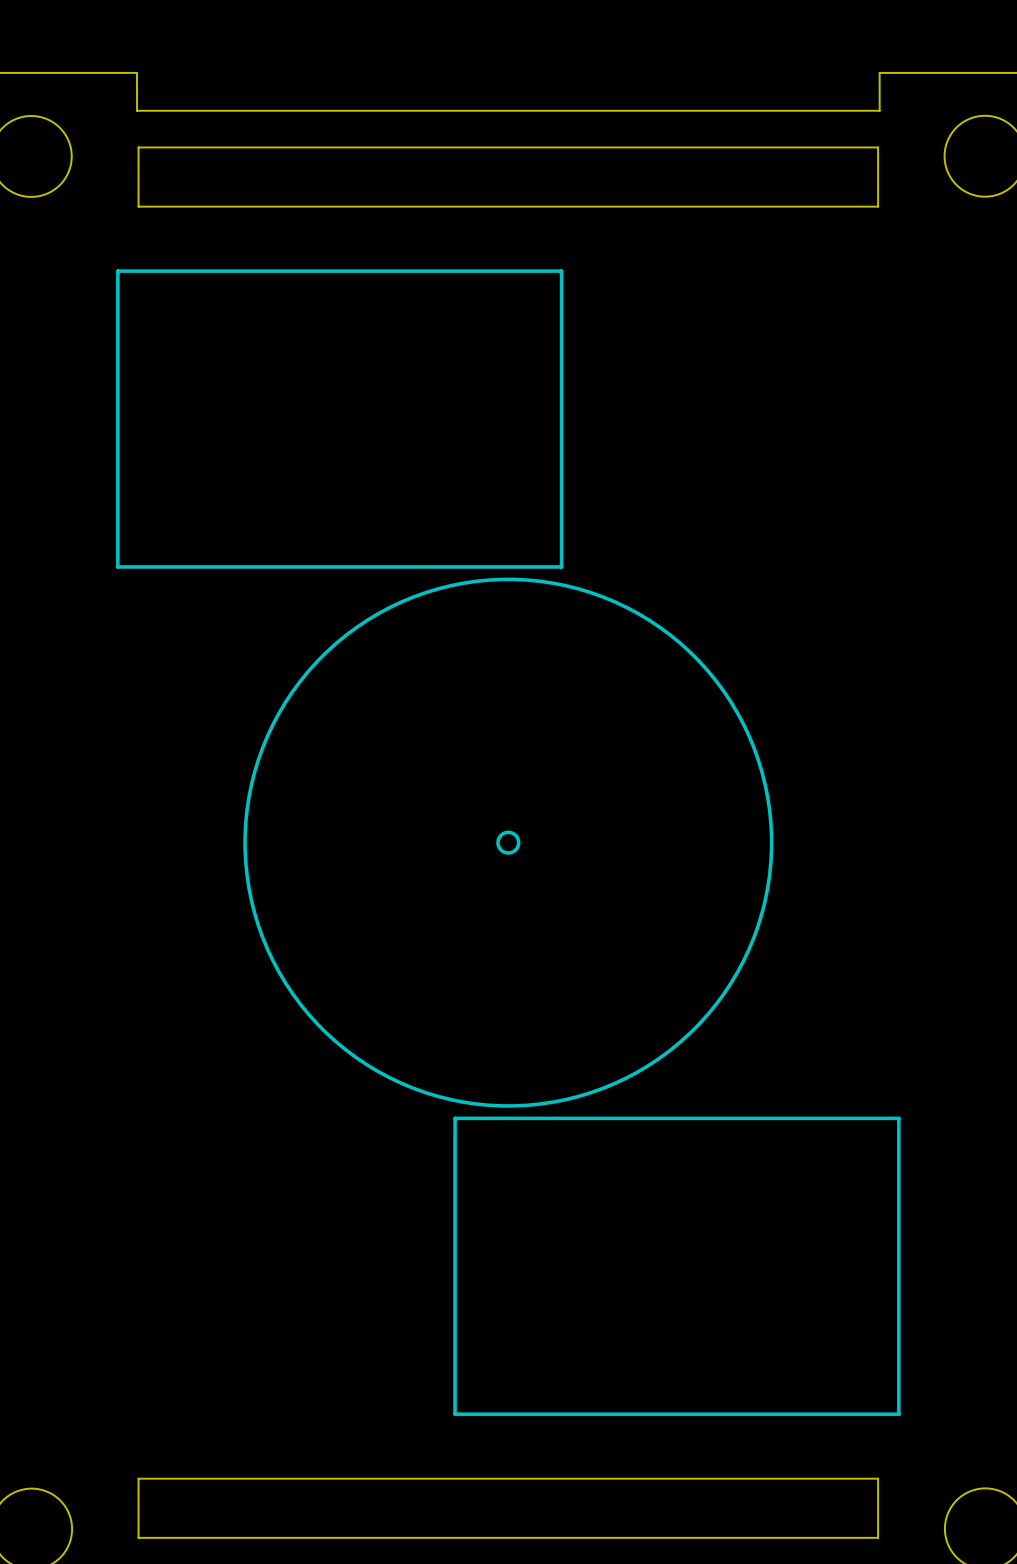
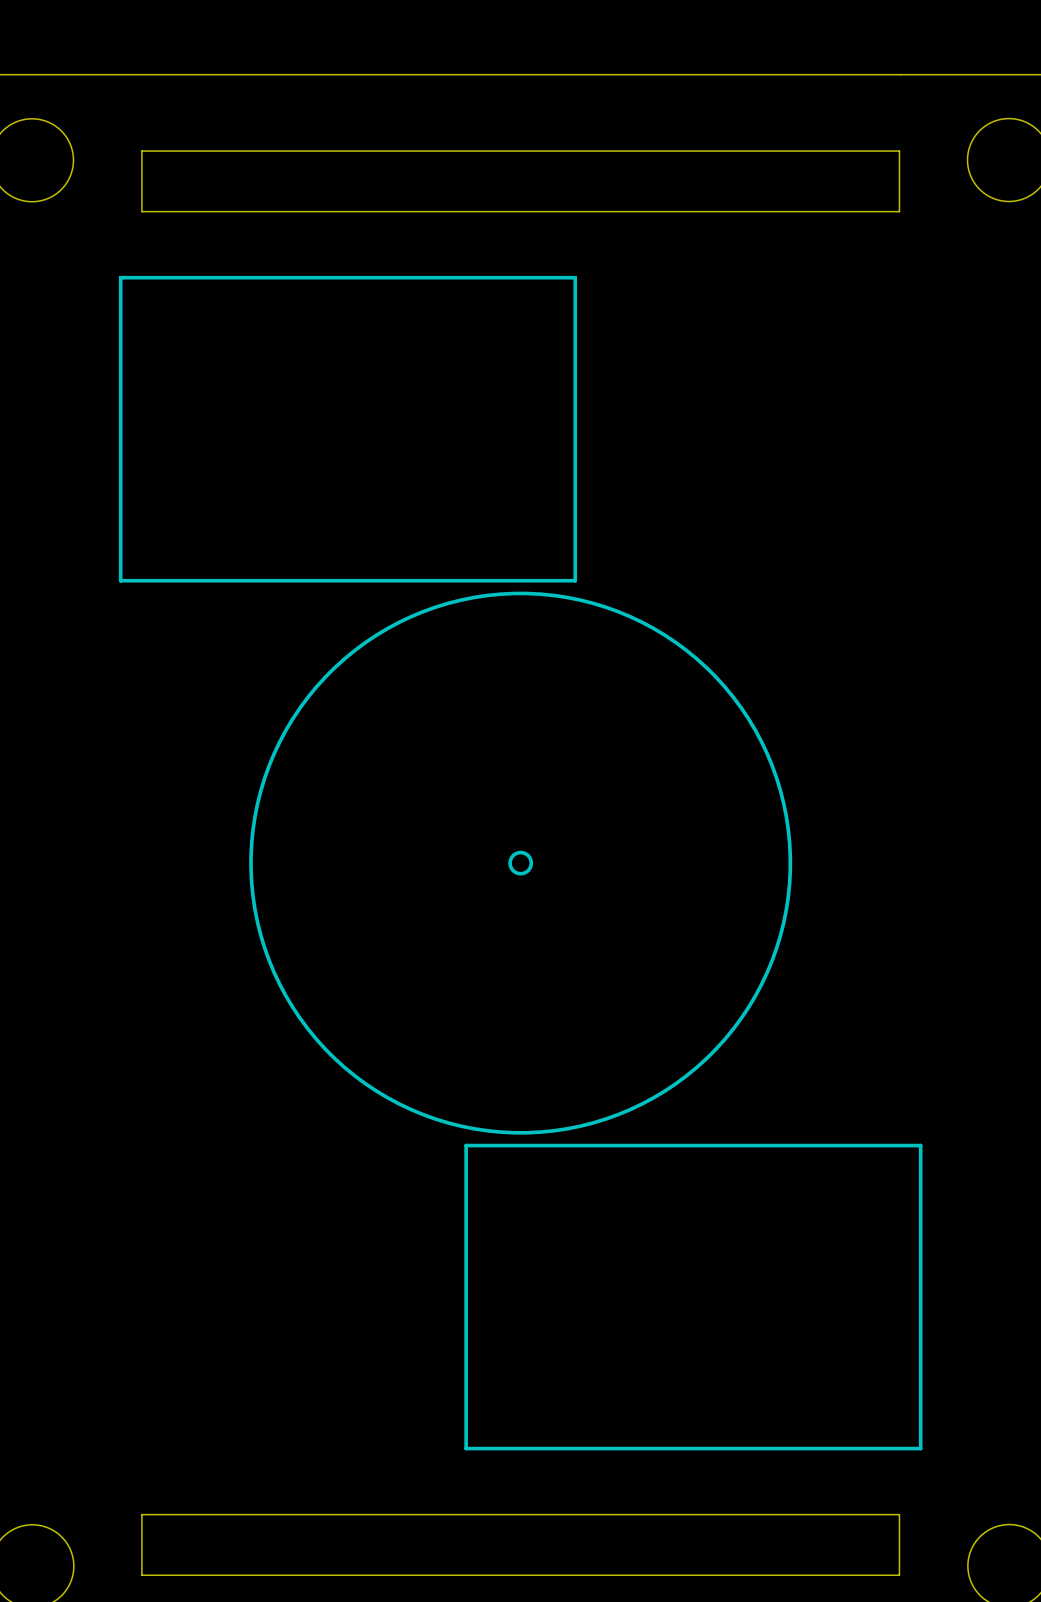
board edge: (137, 72) (137, 110) (879, 110) (879, 72) -> (140, 74) (901, 74)

